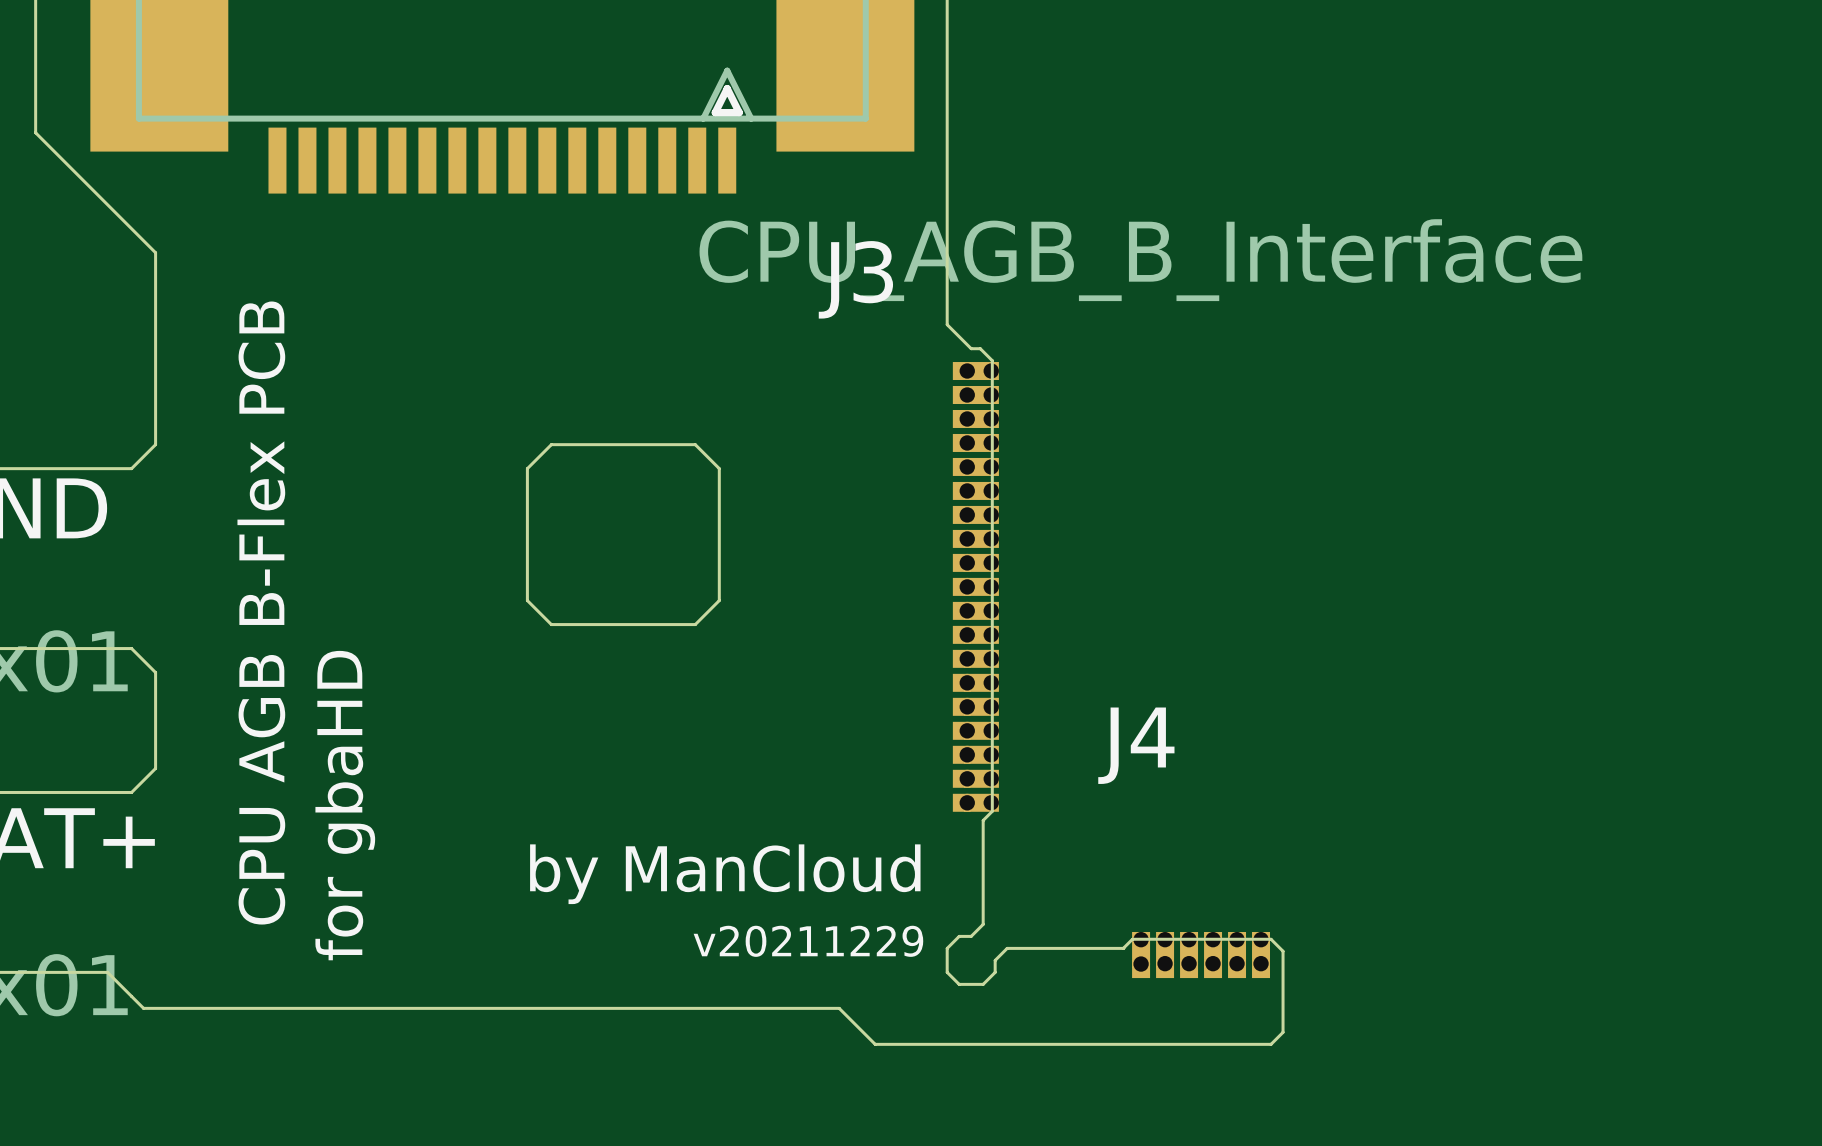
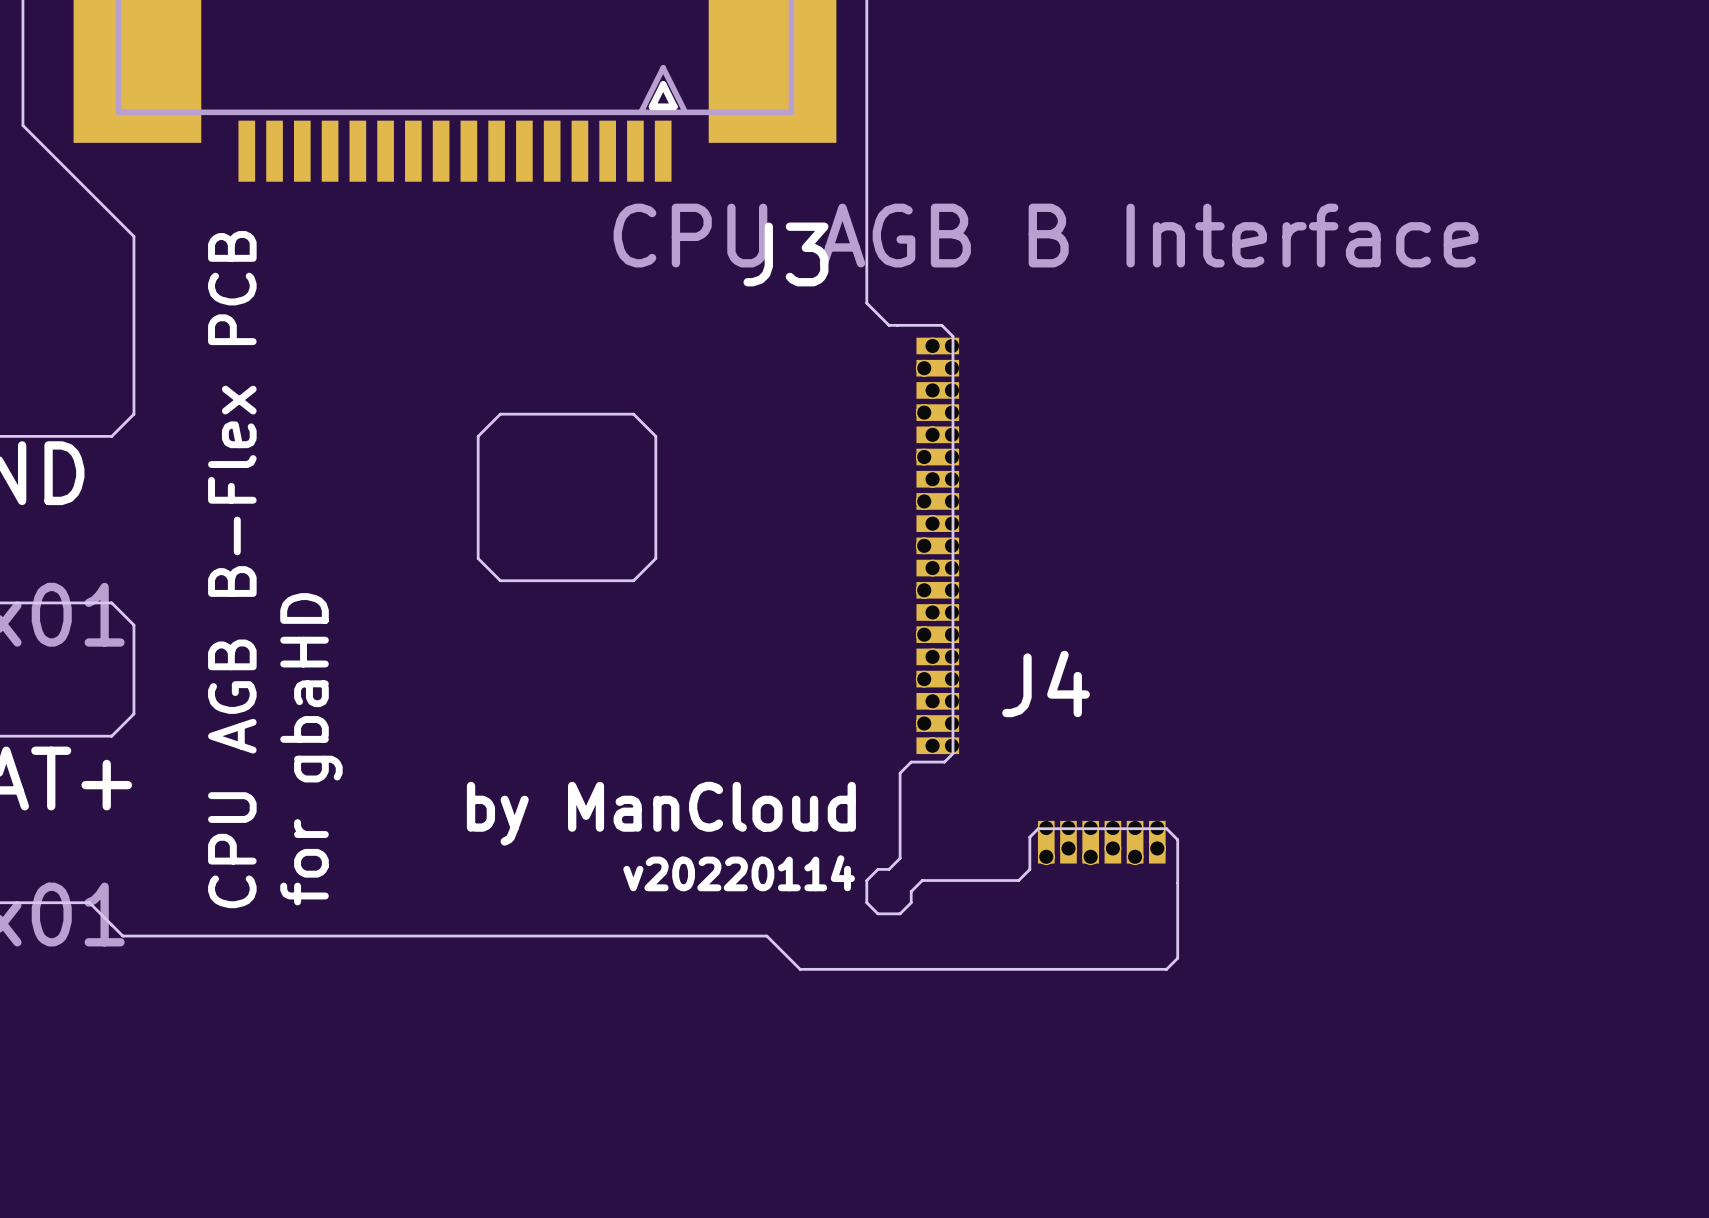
J4 value: CPU_AGB_B_Interface (1140, 260) -> CPU AGB B Interface (1046, 235)
board edge: (980, 348) (992, 360) (992, 811) (983, 820) (983, 832) -> (897, 325) (941, 325) (952, 336) (952, 753) (944, 762) (911, 762) (900, 773)
J4 footprint: [952, 362, 1271, 979] -> [915, 337, 1166, 866]
text: v20211229 (808, 941) -> v20220114 (739, 873)
board edge: (1111, 948) (1123, 948) -> none
board edge: (1123, 948) (1132, 939) (1271, 939) (1283, 951) -> (1018, 880) (1029, 869) (1029, 837) (1038, 828) (1166, 828) (1177, 839) (1177, 883)

